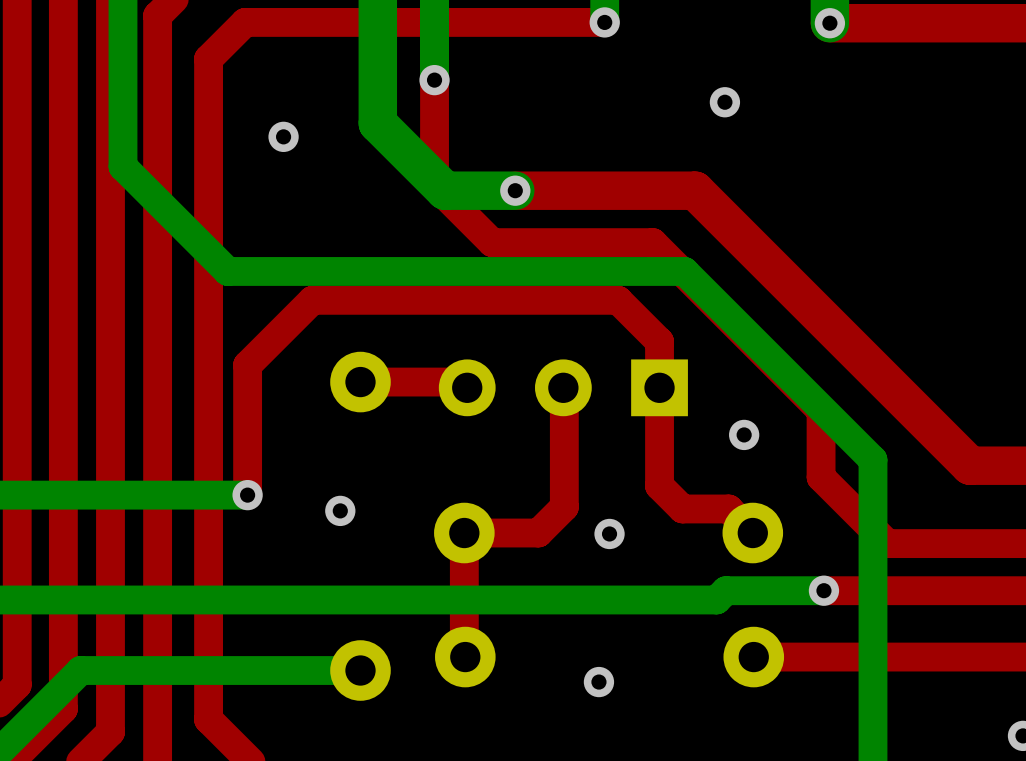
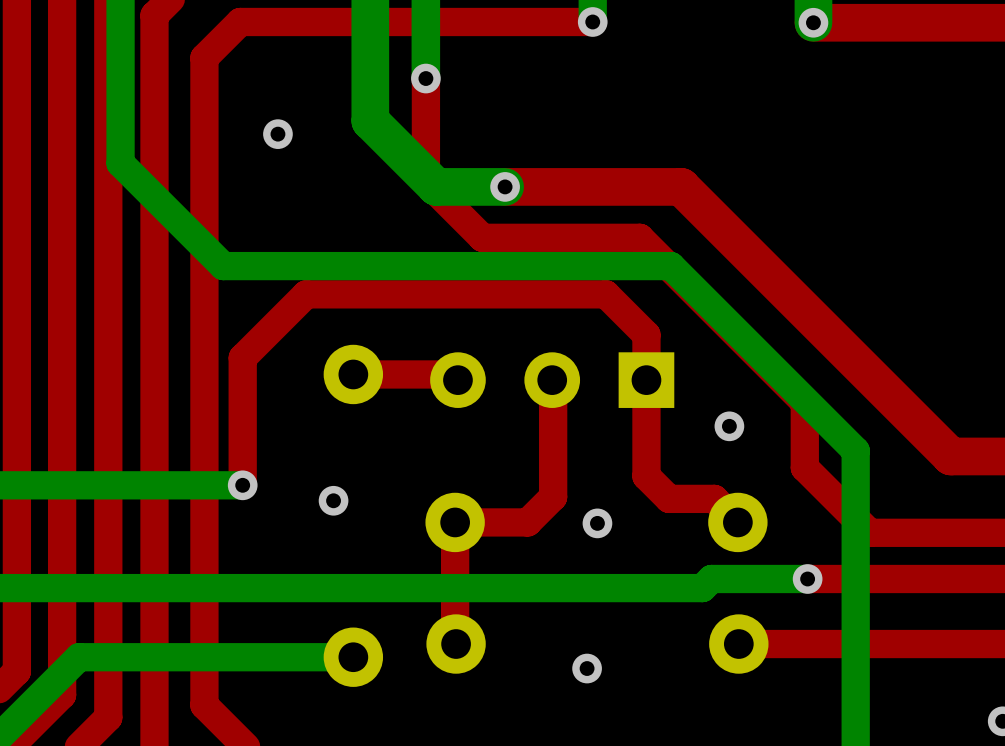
via: (724, 102) -> none

